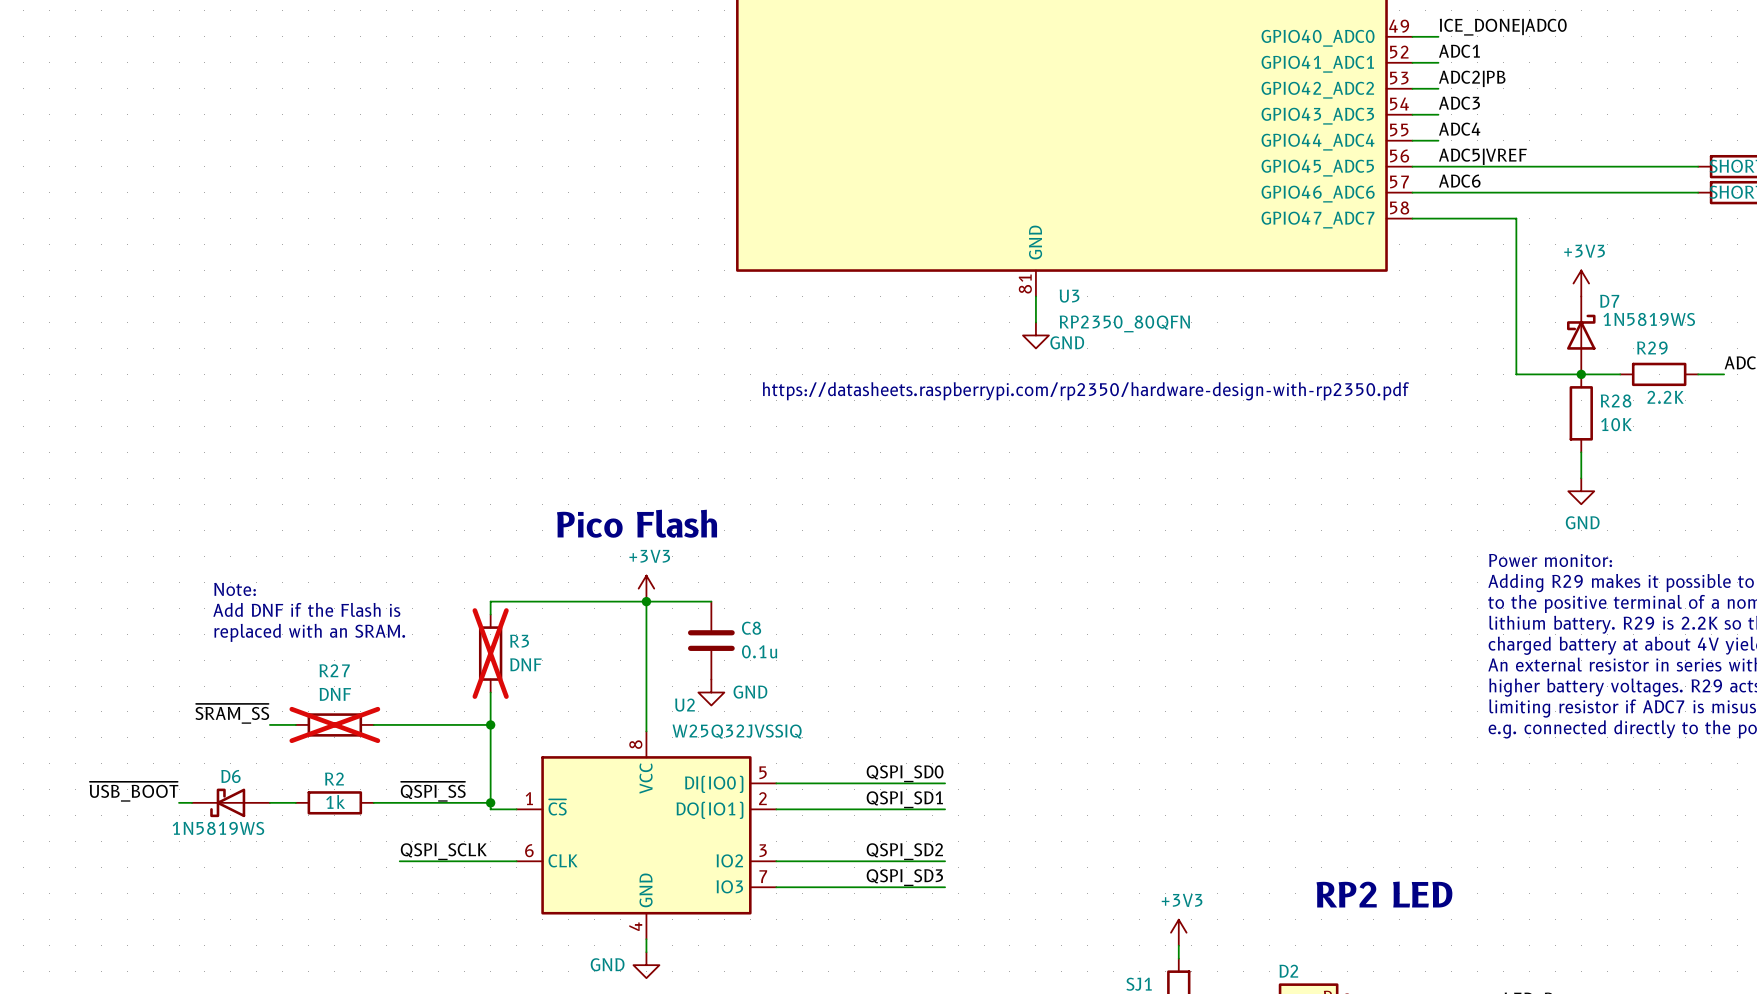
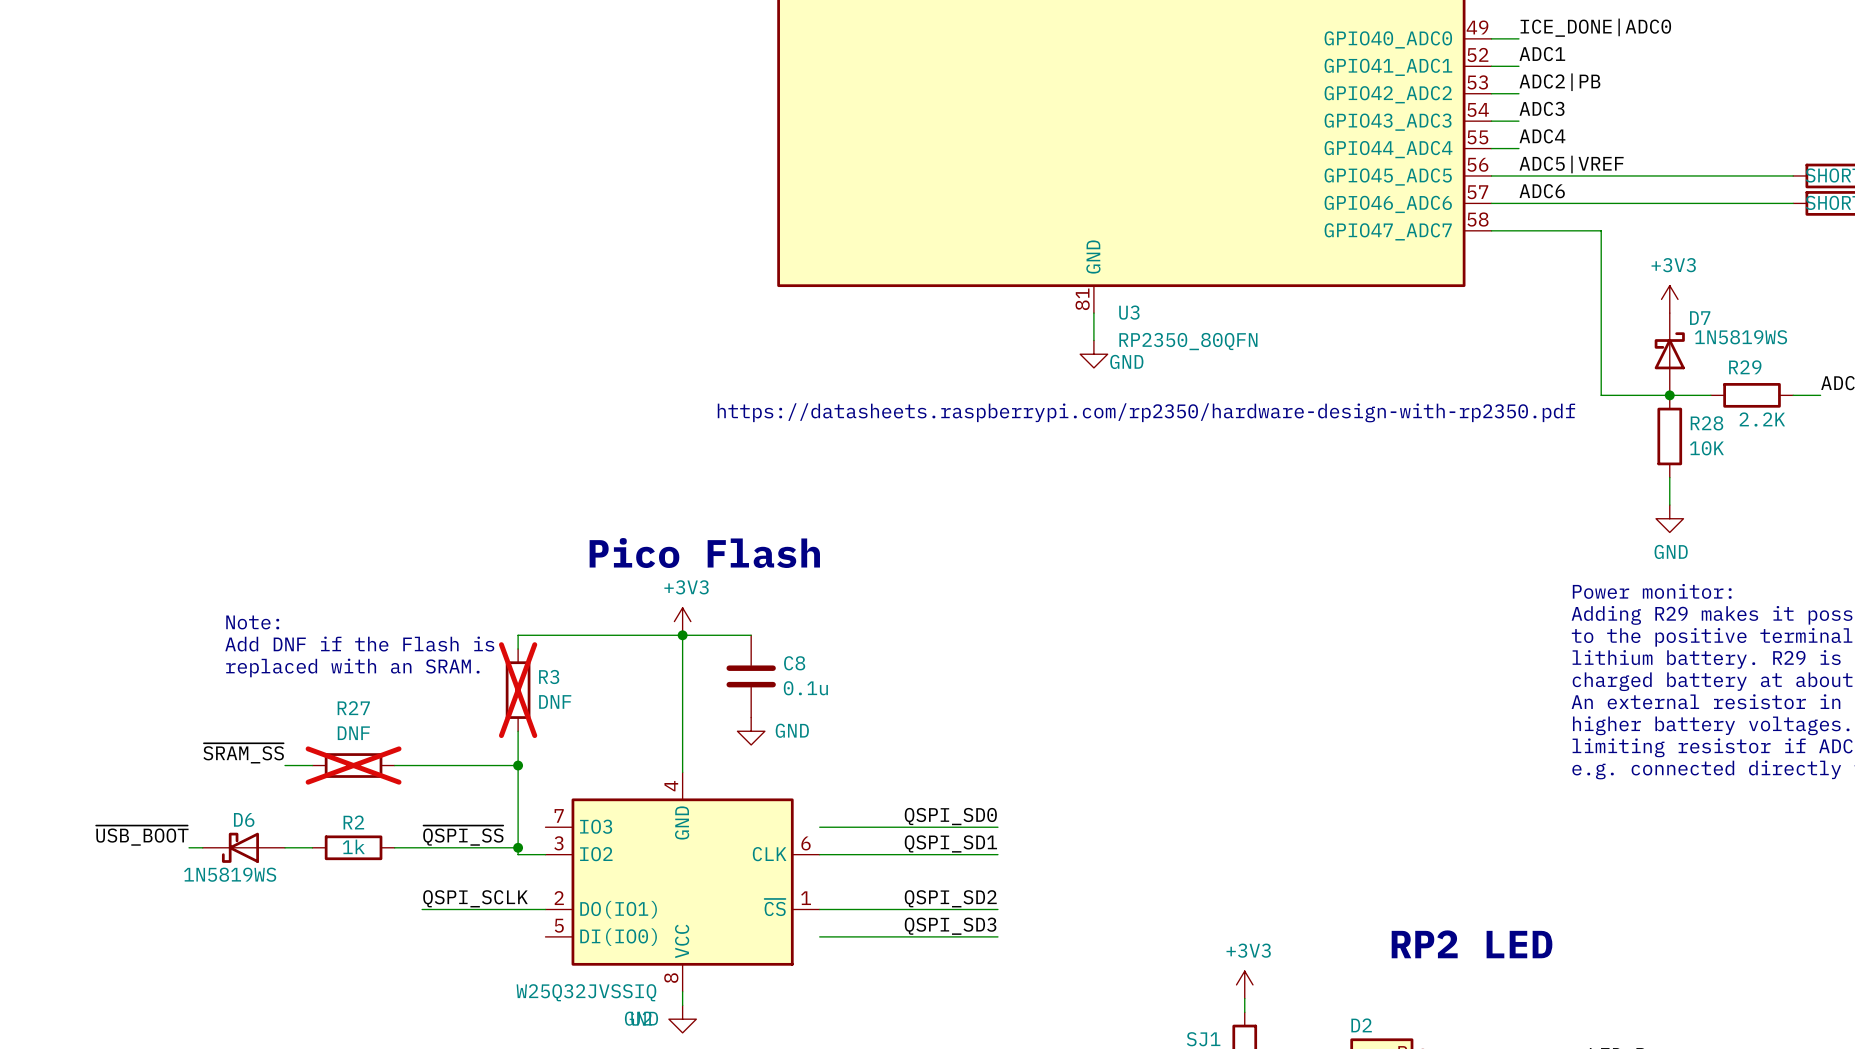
U2 rotation: 0° (646, 835) -> 180° (682, 882)

